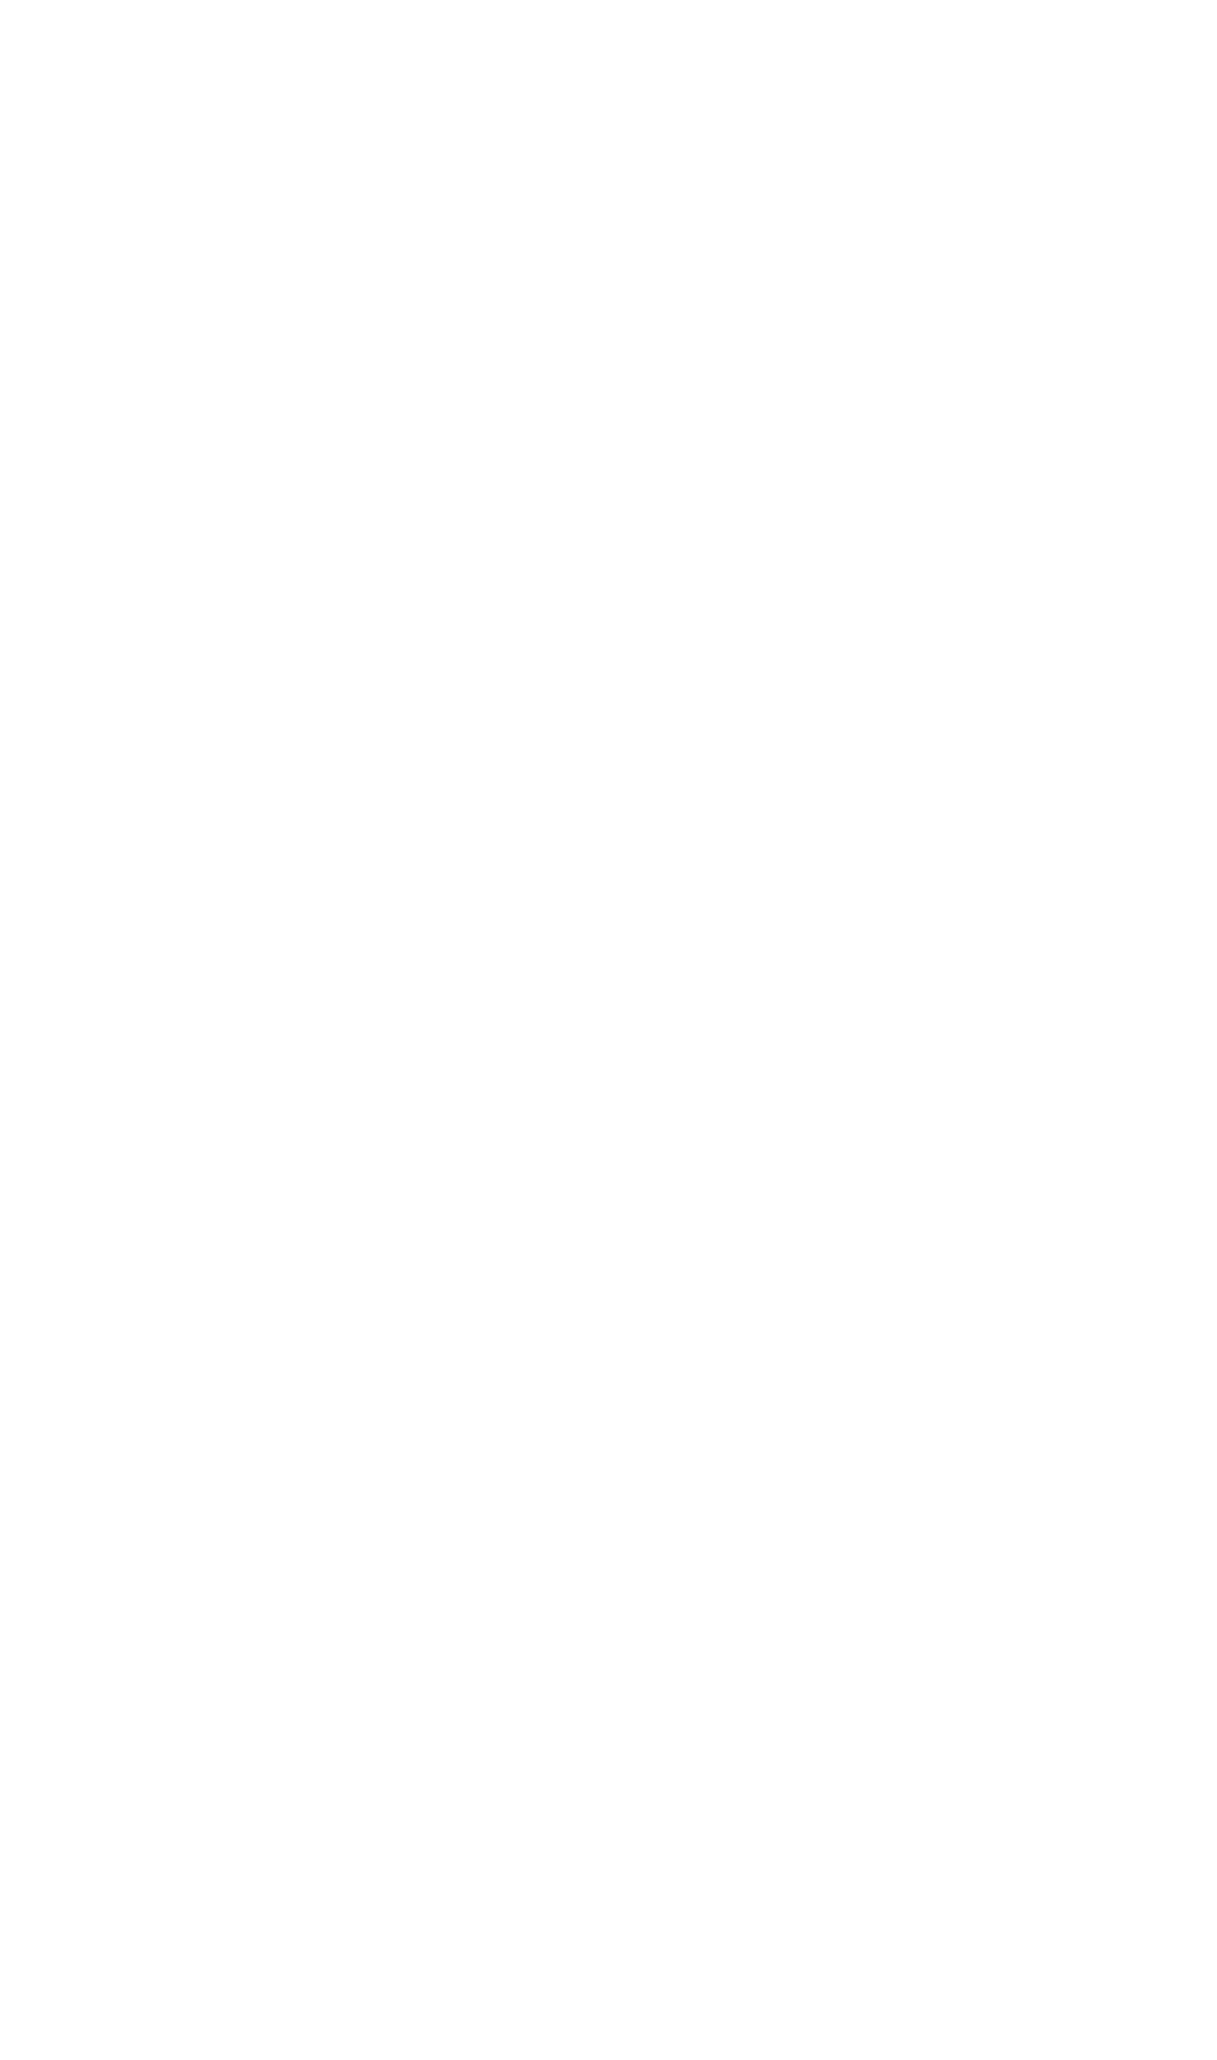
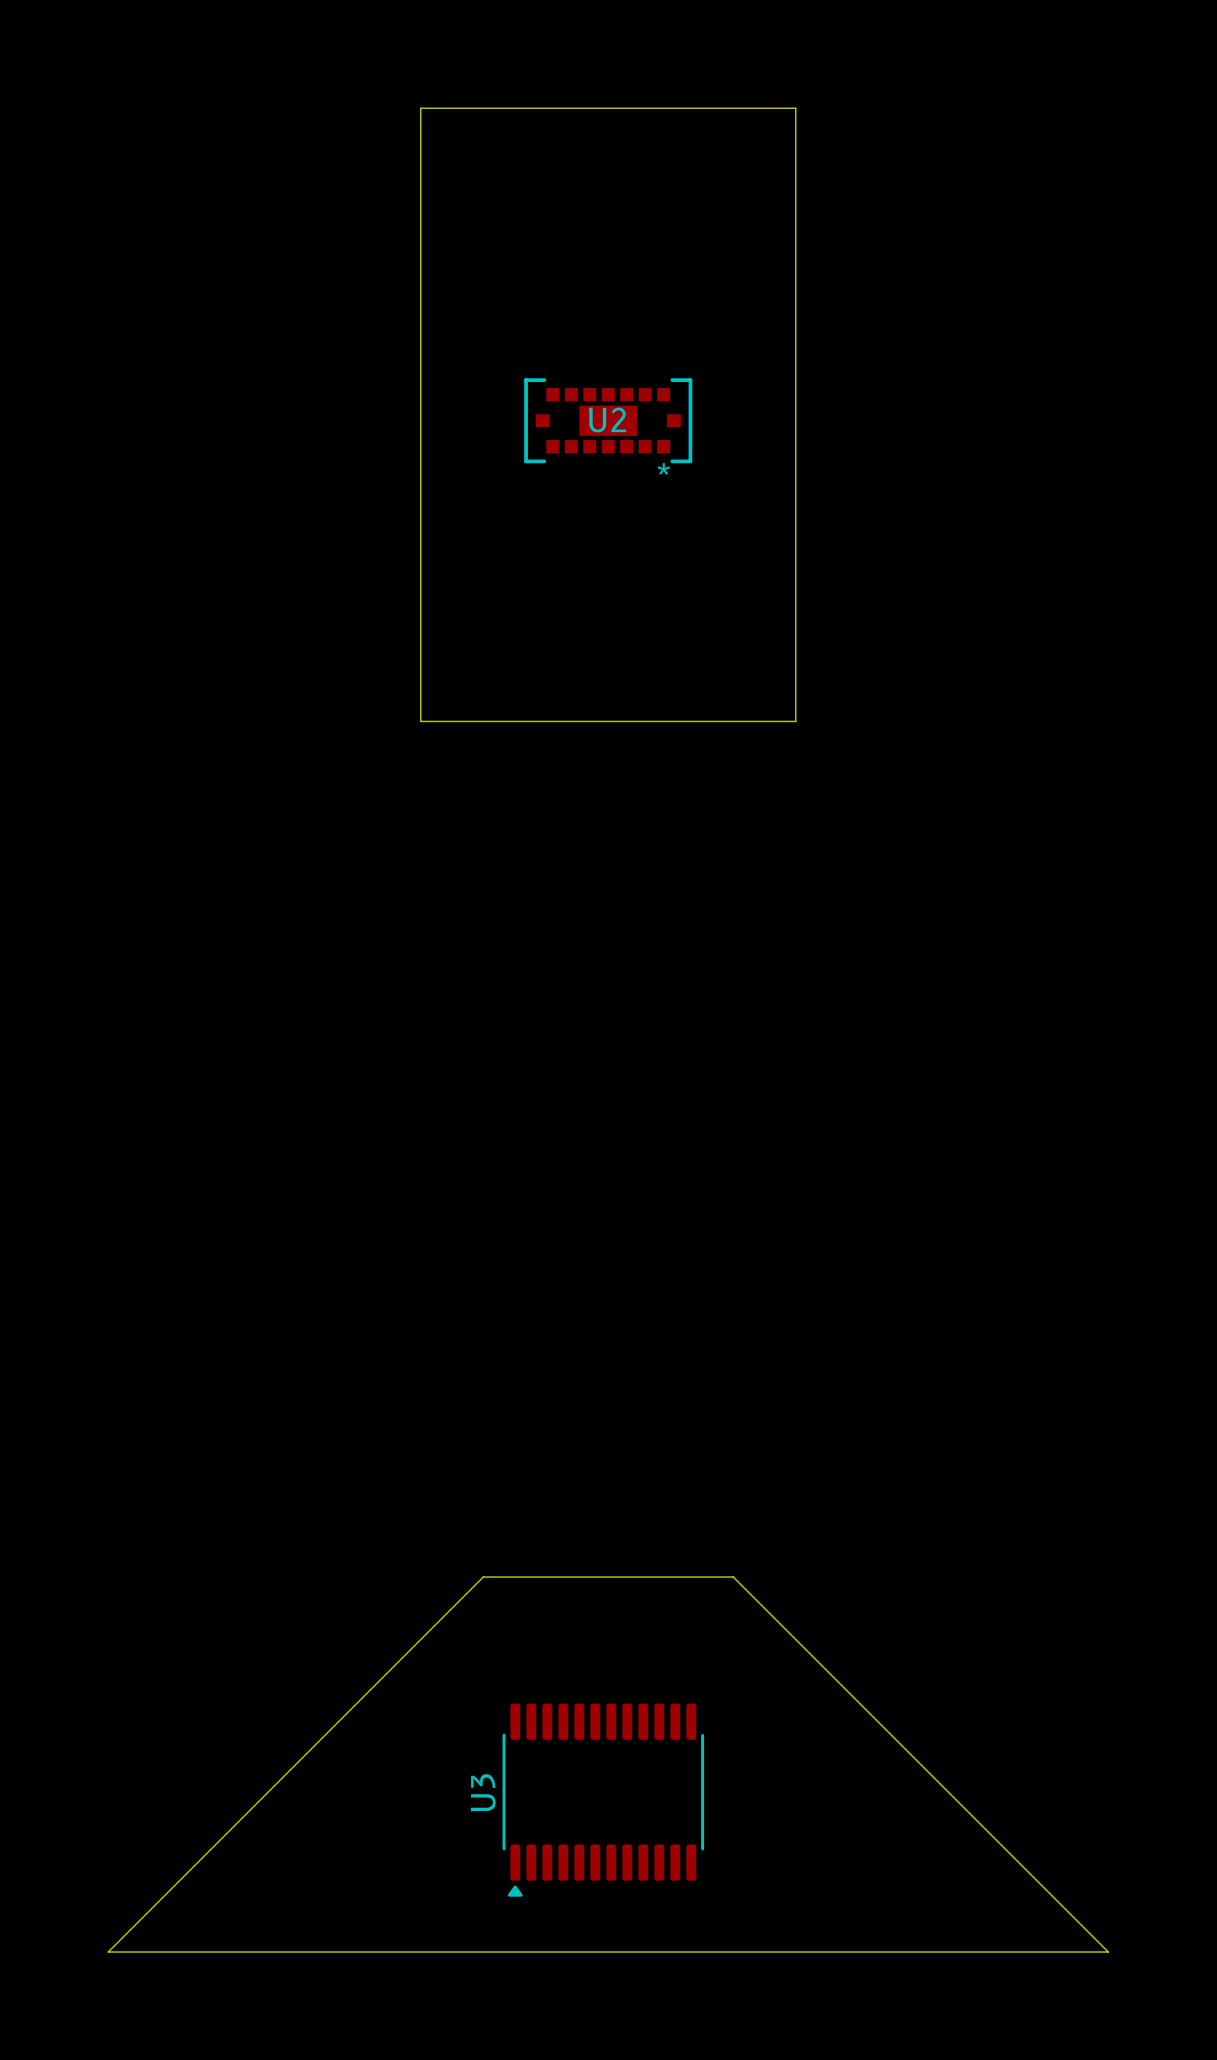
board edge: none -> (420, 108) (795, 108) (795, 721) (420, 721) (420, 108)
U2: none -> (608, 420)
board edge: none -> (483, 1577) (108, 1952) (1108, 1952) (733, 1577) (483, 1577)
U3: none -> (603, 1800)

